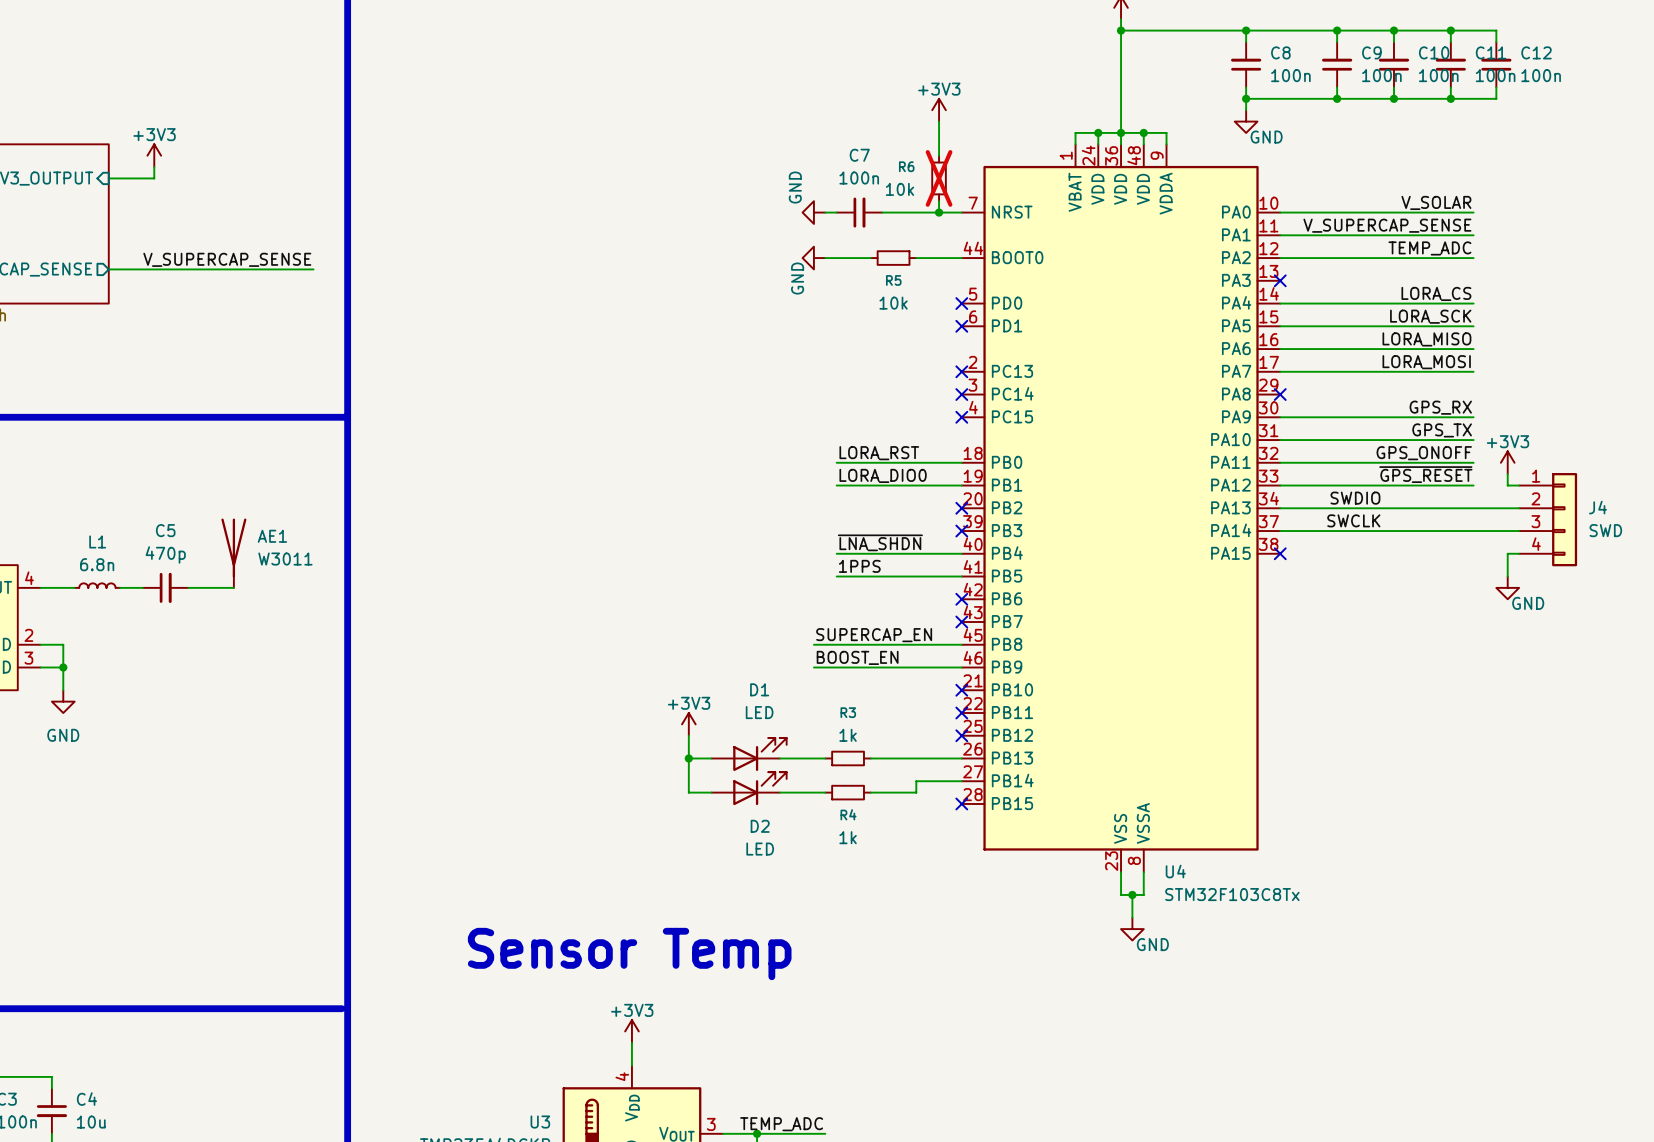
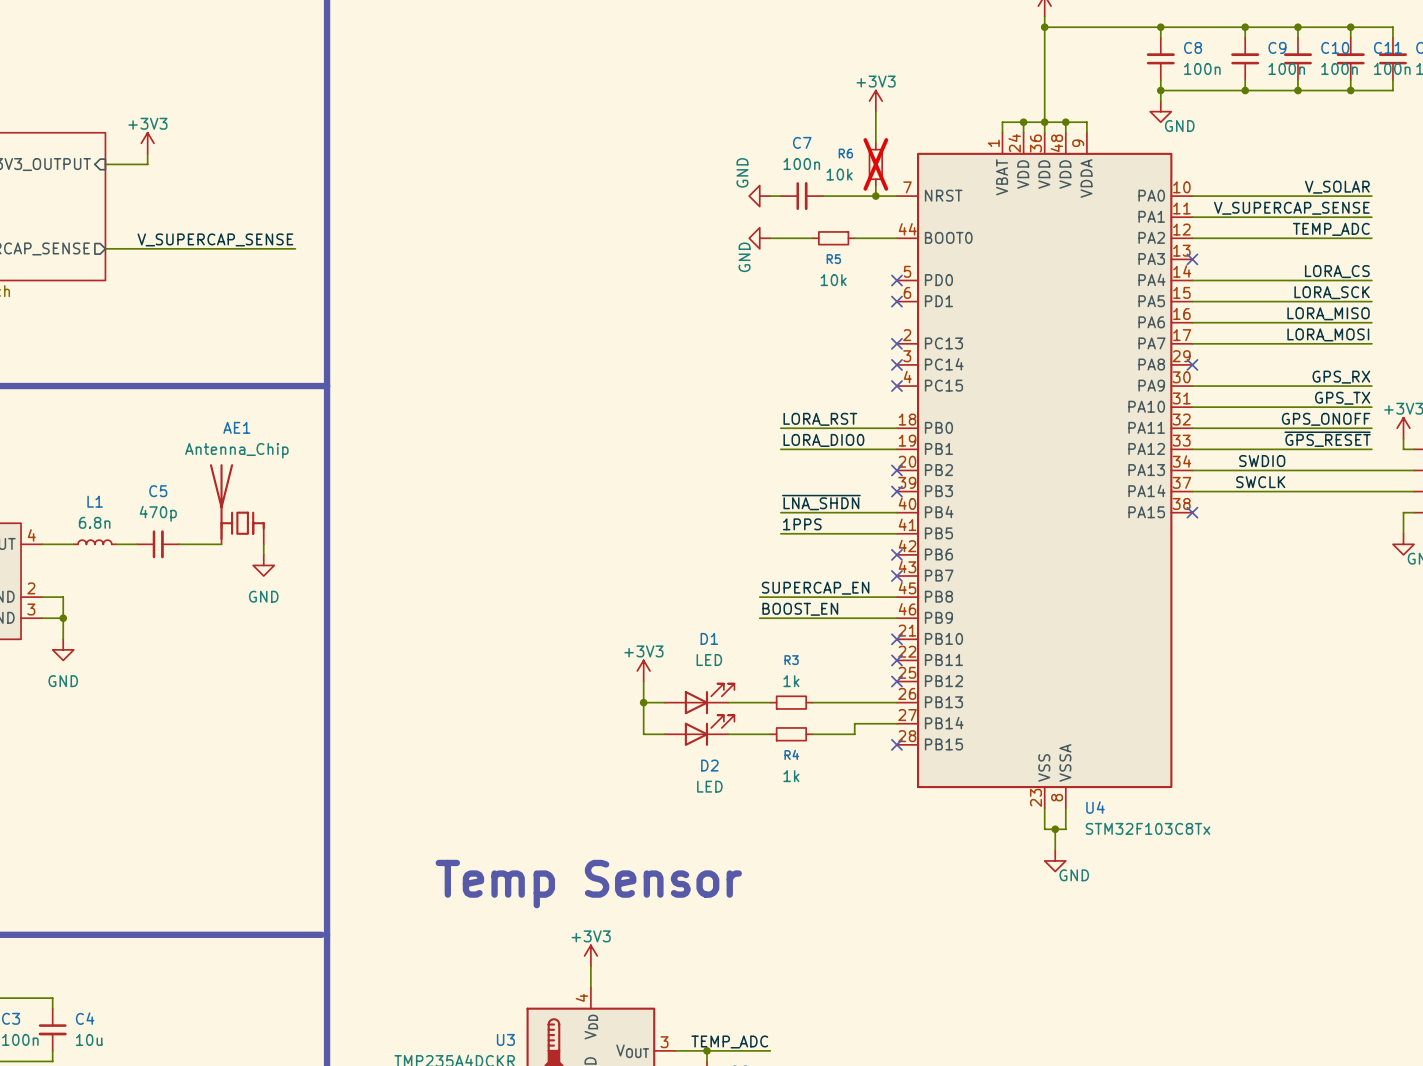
AE1 symbol: [221, 518, 247, 588] -> [209, 464, 265, 545]
AE1 name position: AE1 (272, 536) -> AE1 (236, 427)
AE1 value: W3011 (285, 559) -> Antenna_Chip (236, 450)
wire: none -> (263, 544) (263, 554)
power symbol: none -> GND (263, 565)
text: Sensor Temp (629, 954) -> Temp Sensor (588, 884)

